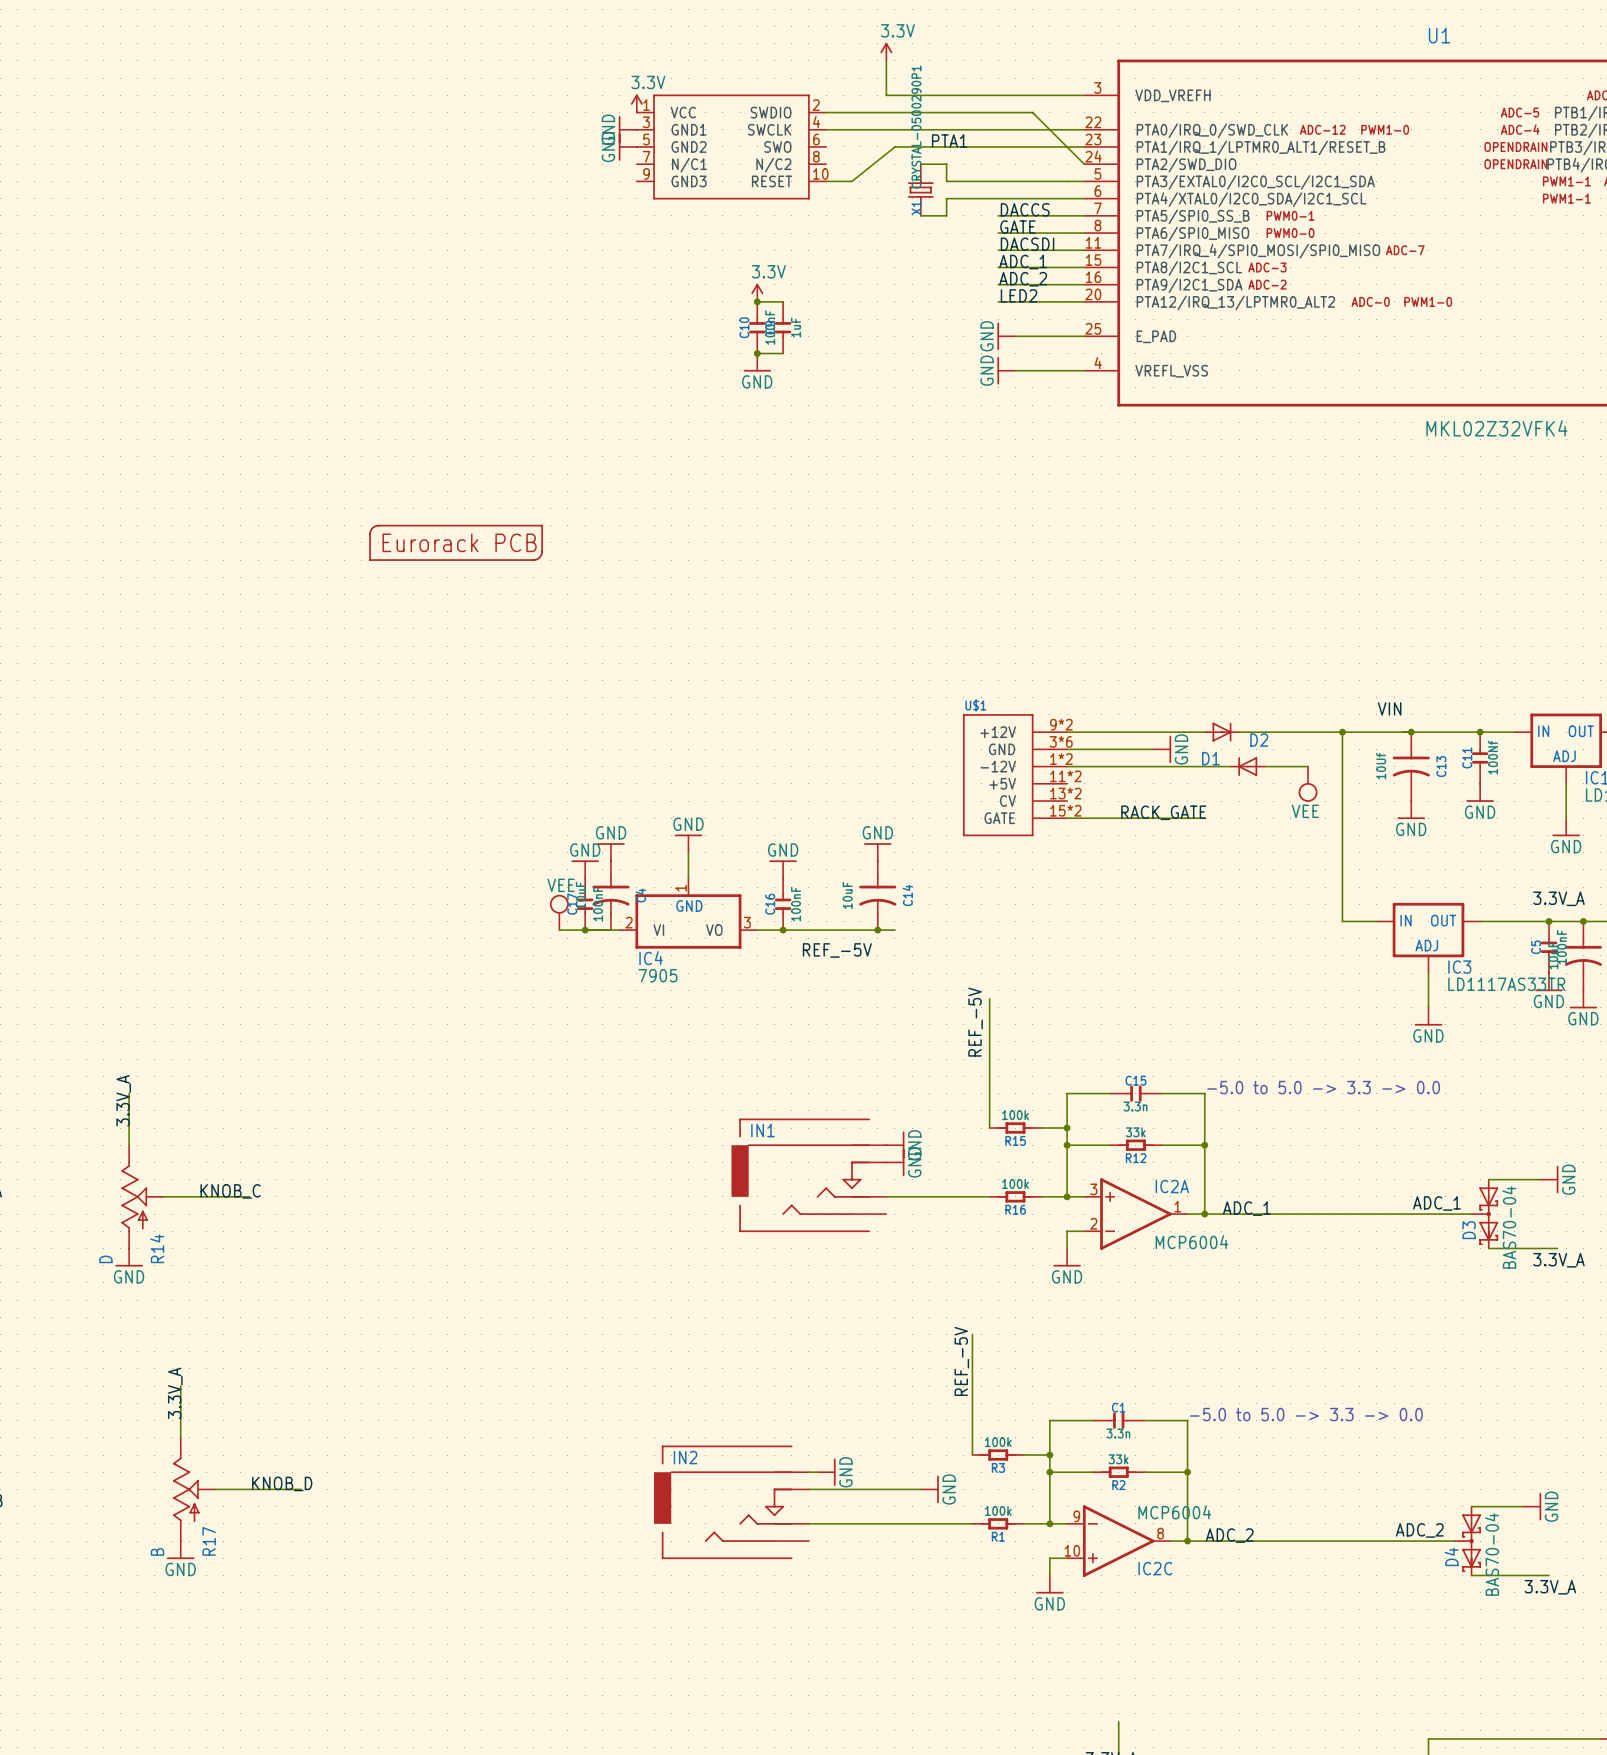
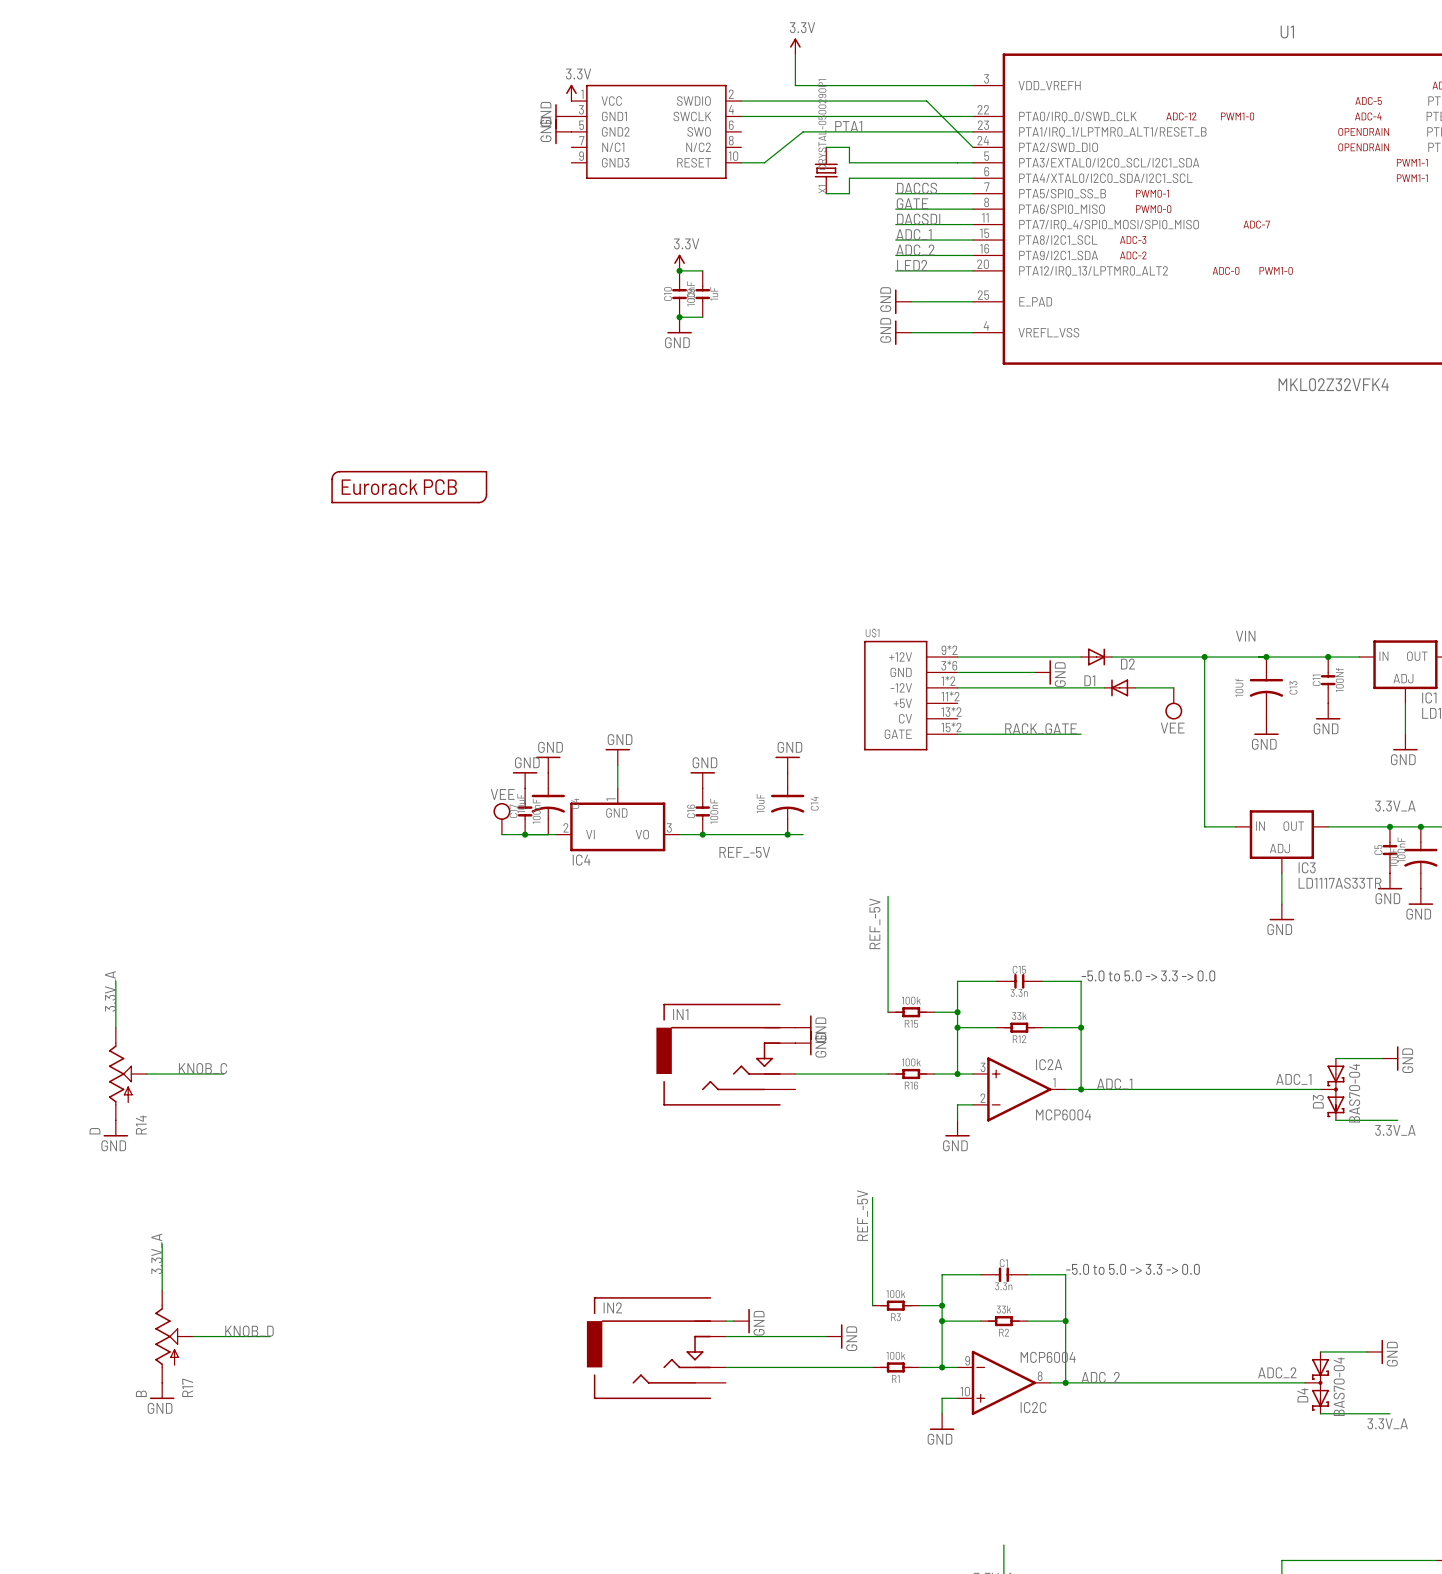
IC4 value: 7905 (657, 975) -> none

